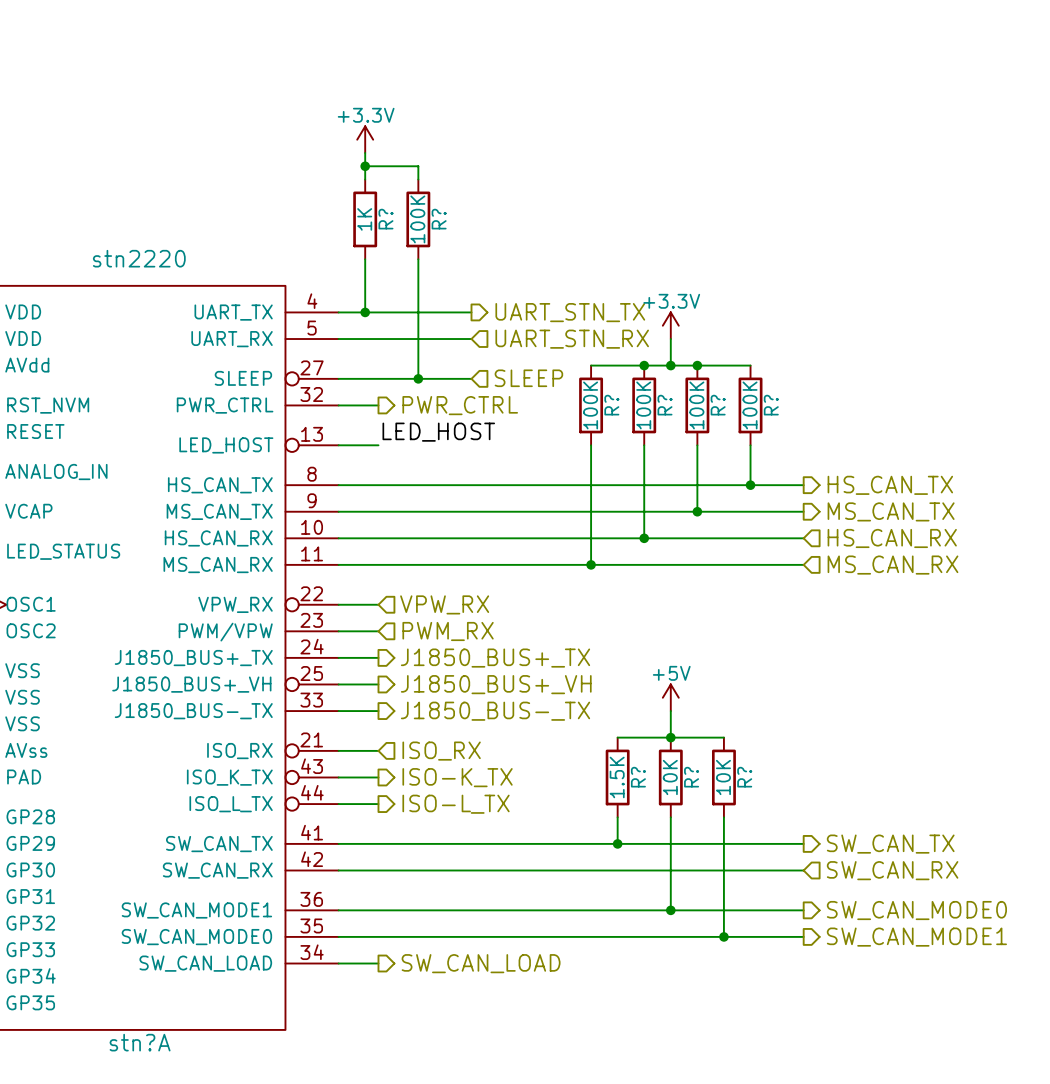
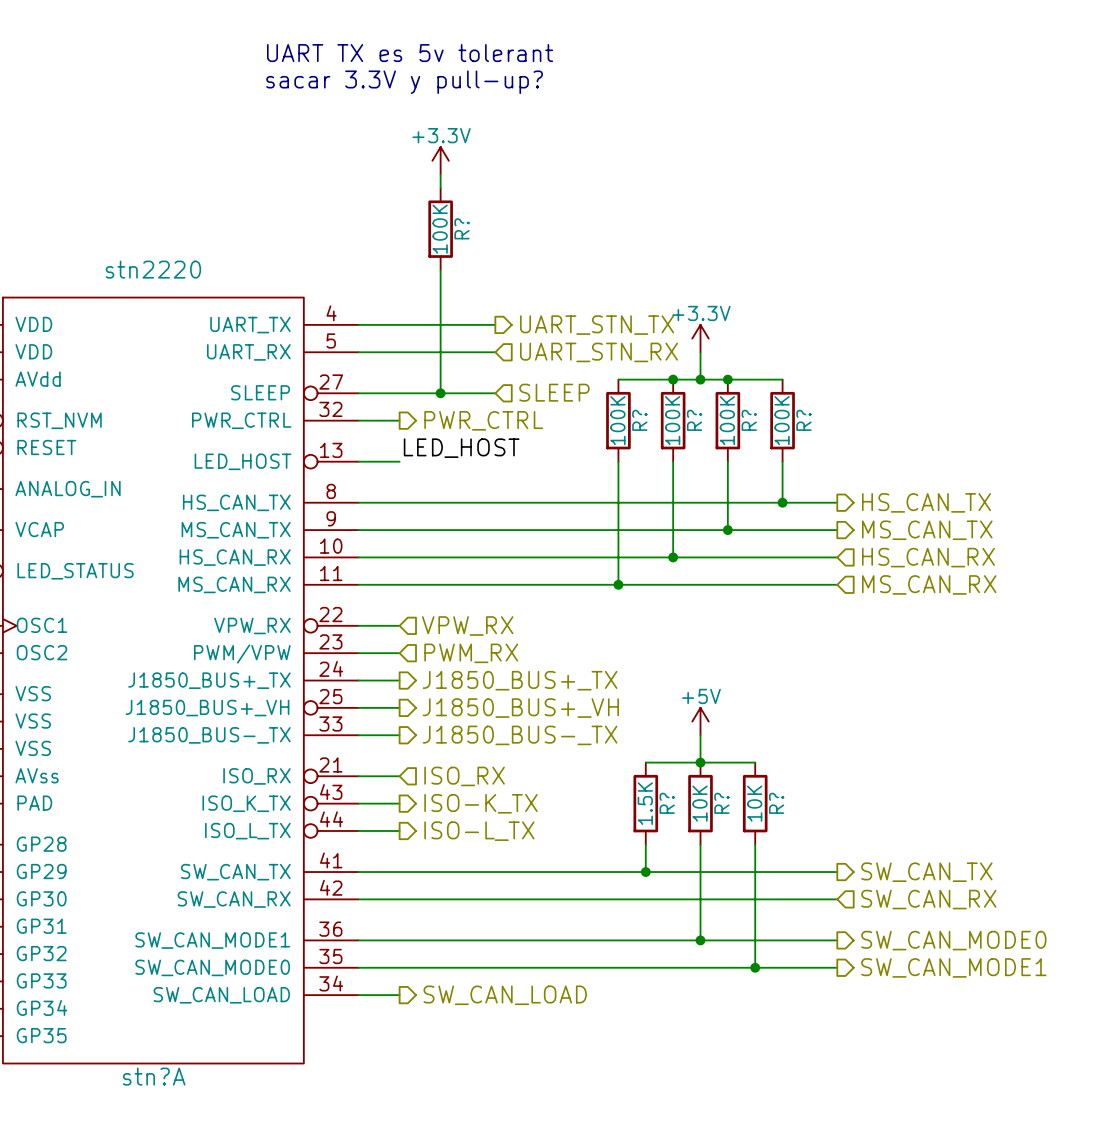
text: none -> UART TX es 5v tolerant (410, 53)
text: none -> sacar 3.3V y pull-up? (404, 82)
power symbol position: +3.3V (365, 139) -> +3.3V (440, 160)
wire: (365, 152) (365, 179) -> none
wire: (365, 166) (418, 166) -> none
junction: (365, 166) -> none
R?: 1K (365, 219) -> none
wire: (365, 259) (365, 312) -> none
junction: (365, 312) -> none

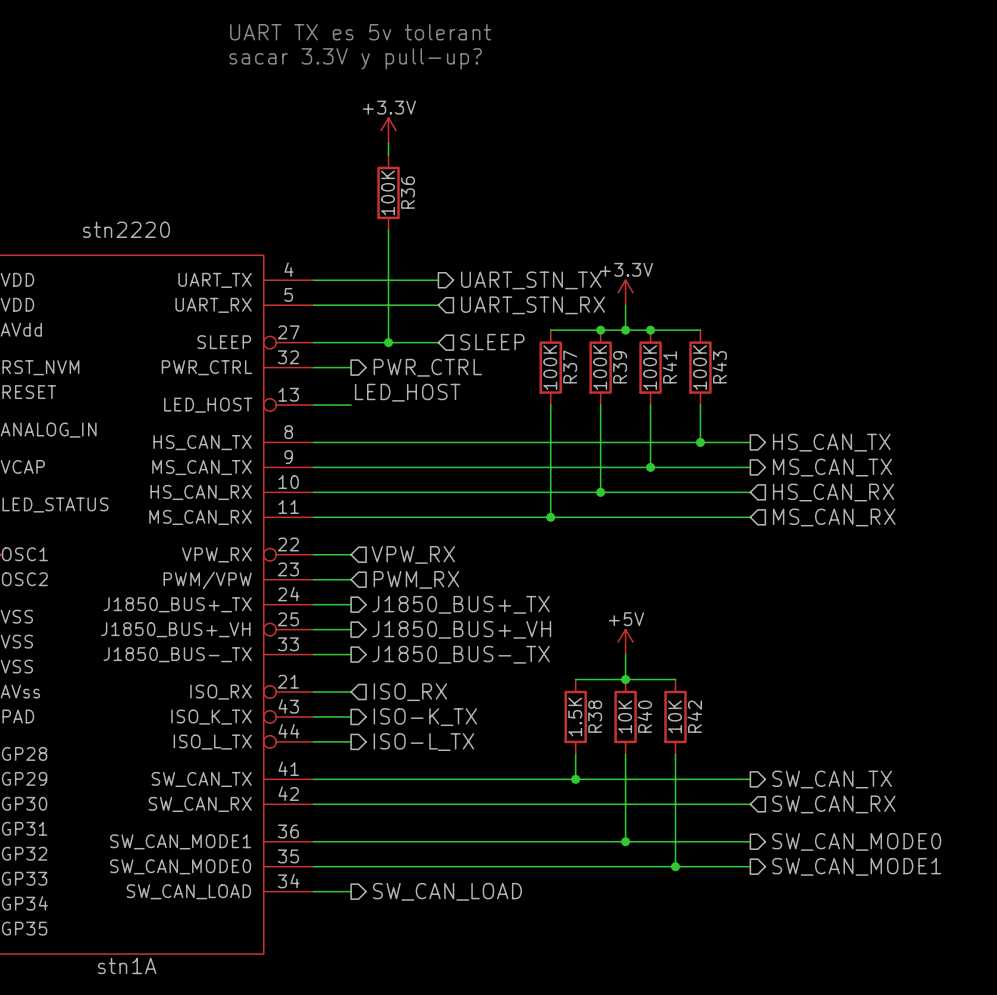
R? name: R? (462, 228) -> R36 (408, 192)
R? name: R? (639, 420) -> R37 (570, 367)
R? name: R? (694, 420) -> R39 (620, 367)
R? name: R? (749, 420) -> R41 (669, 367)
R? name: R? (803, 420) -> R43 (719, 367)
R? name: R? (667, 803) -> R38 (595, 716)
R? name: R? (721, 803) -> R40 (644, 716)
R? name: R? (776, 803) -> R42 (694, 716)
stn?A name: stn?A (154, 1076) -> stn1A (127, 965)

